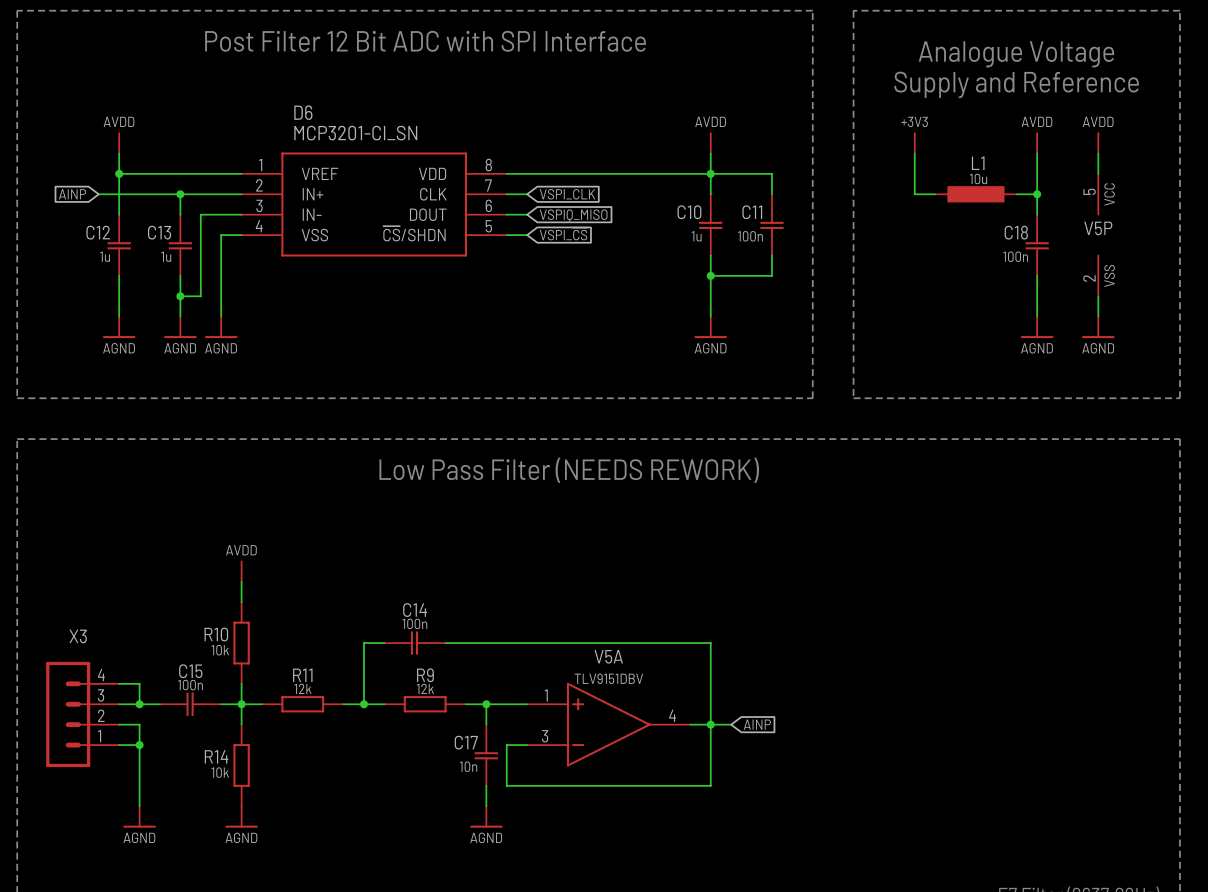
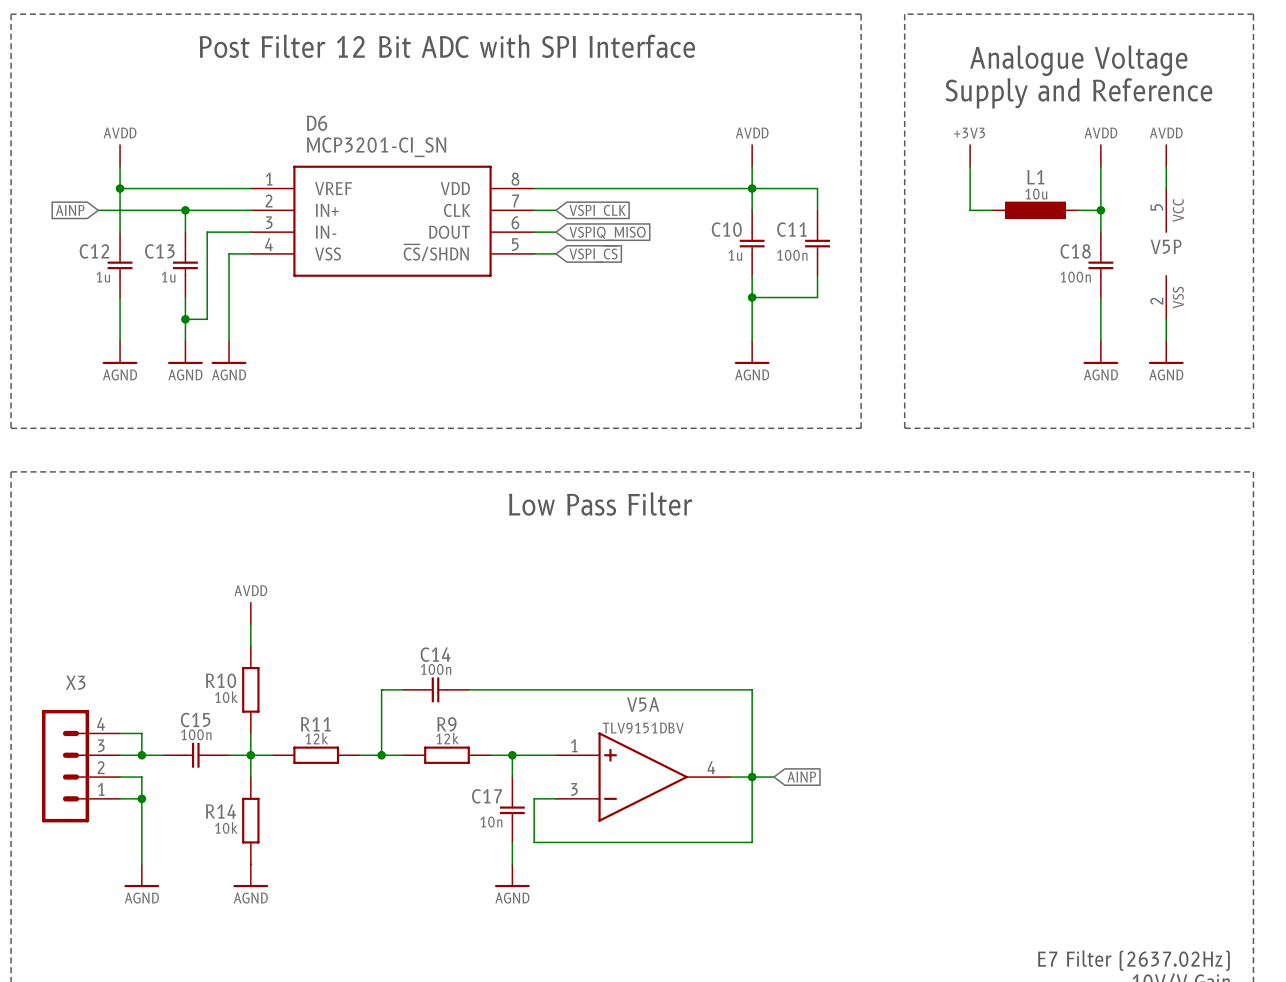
text: Low Pass Filter (NEEDS REWORK) (569, 470) -> Low Pass Filter (600, 503)

